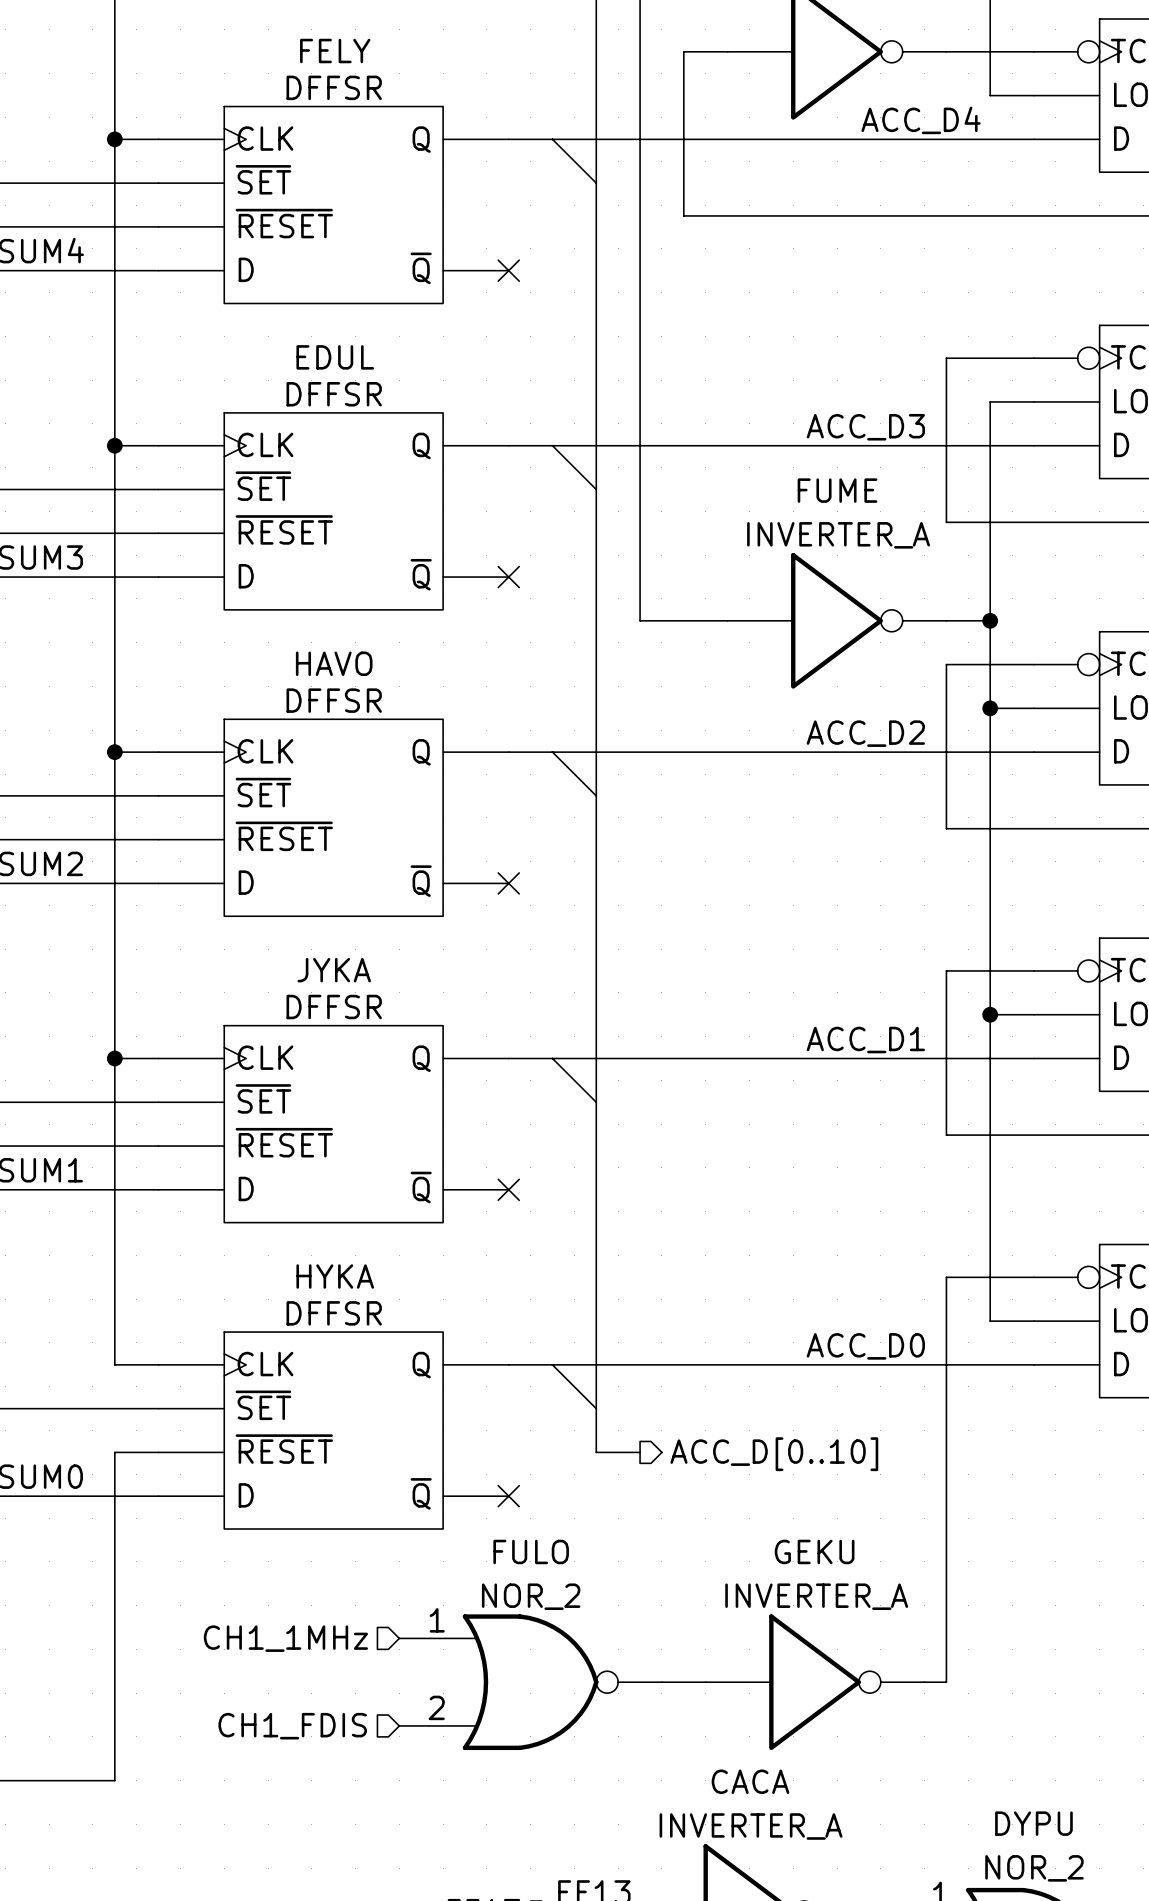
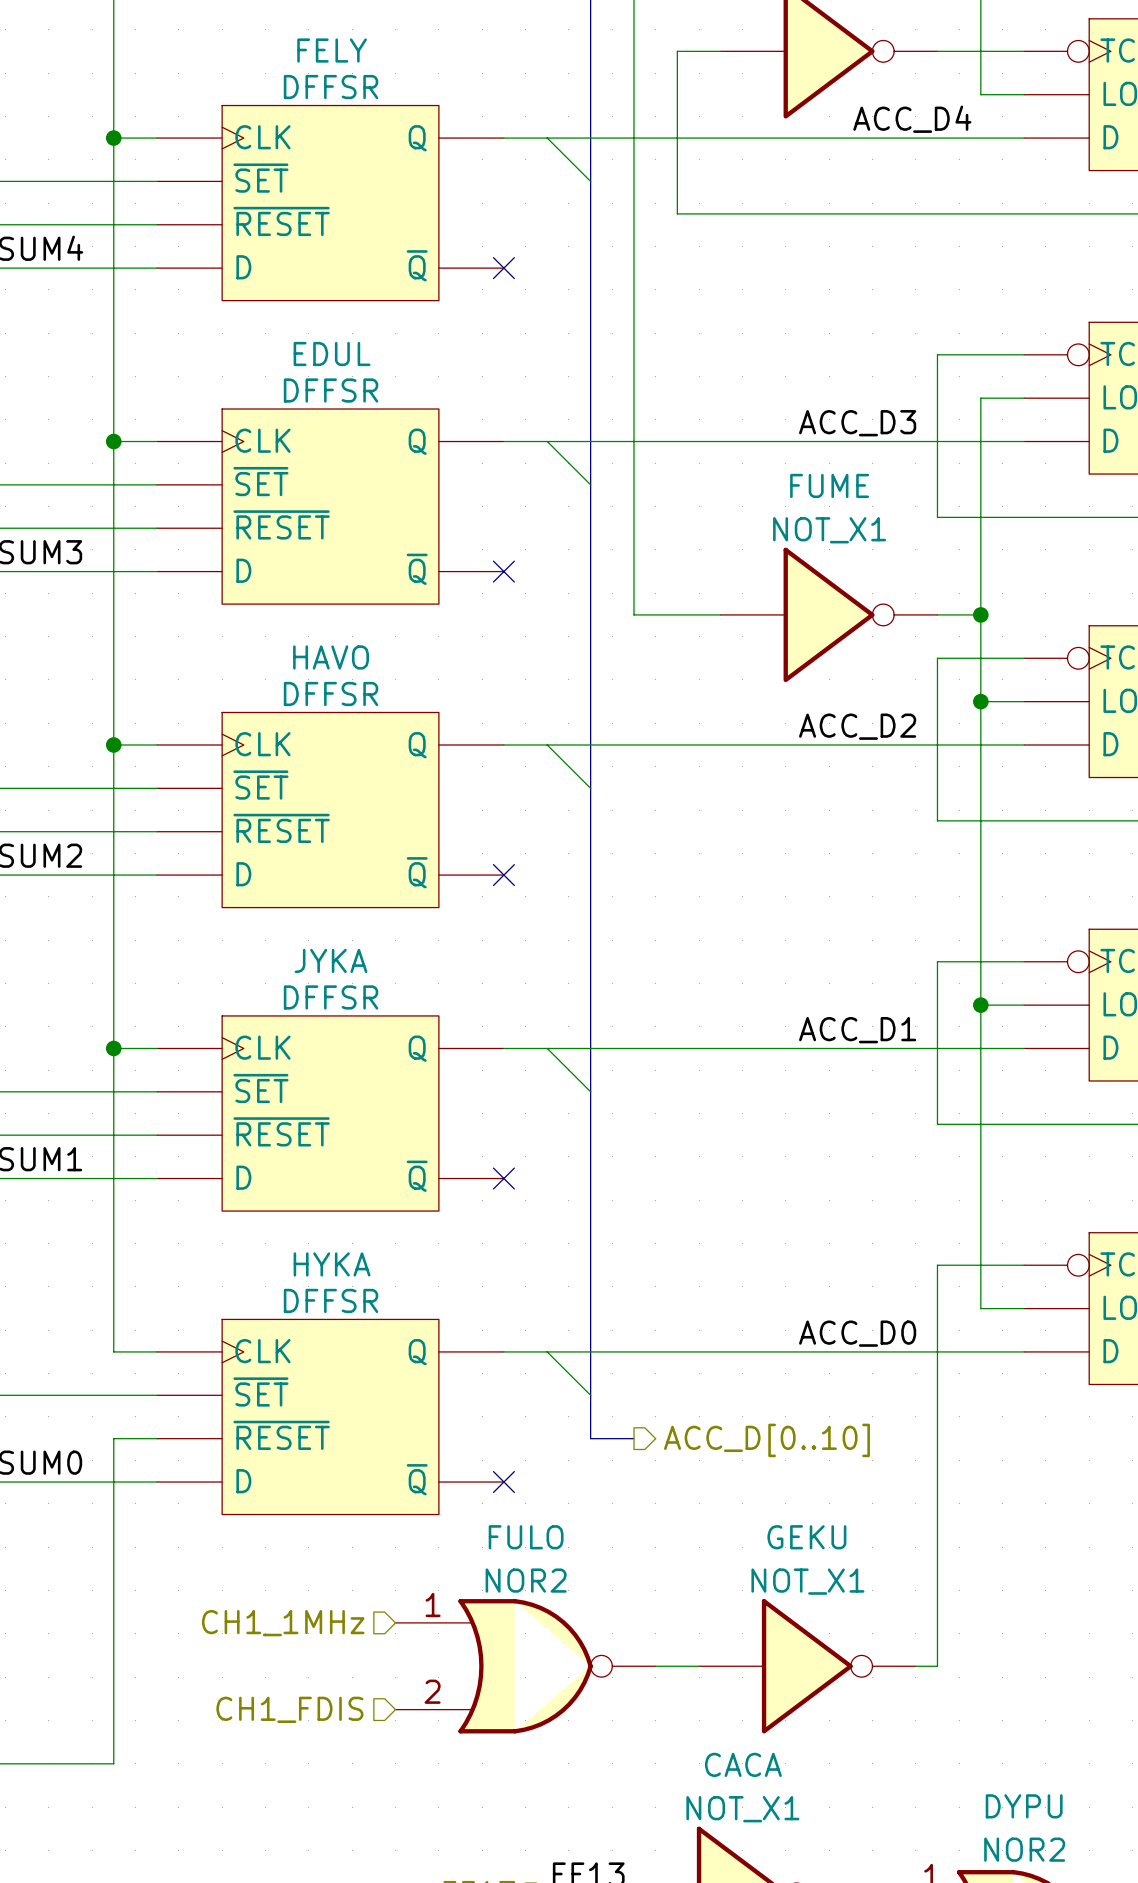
FUME value: INVERTER_A (838, 535) -> NOT_X1 (829, 530)
FULO value: NOR_2 (531, 1596) -> NOR2 (526, 1580)
GEKU value: INVERTER_A (816, 1596) -> NOT_X1 (807, 1581)
CACA value: INVERTER_A (751, 1826) -> NOT_X1 (742, 1809)
DYPU value: NOR_2 (1034, 1868) -> NOR2 (1024, 1849)

